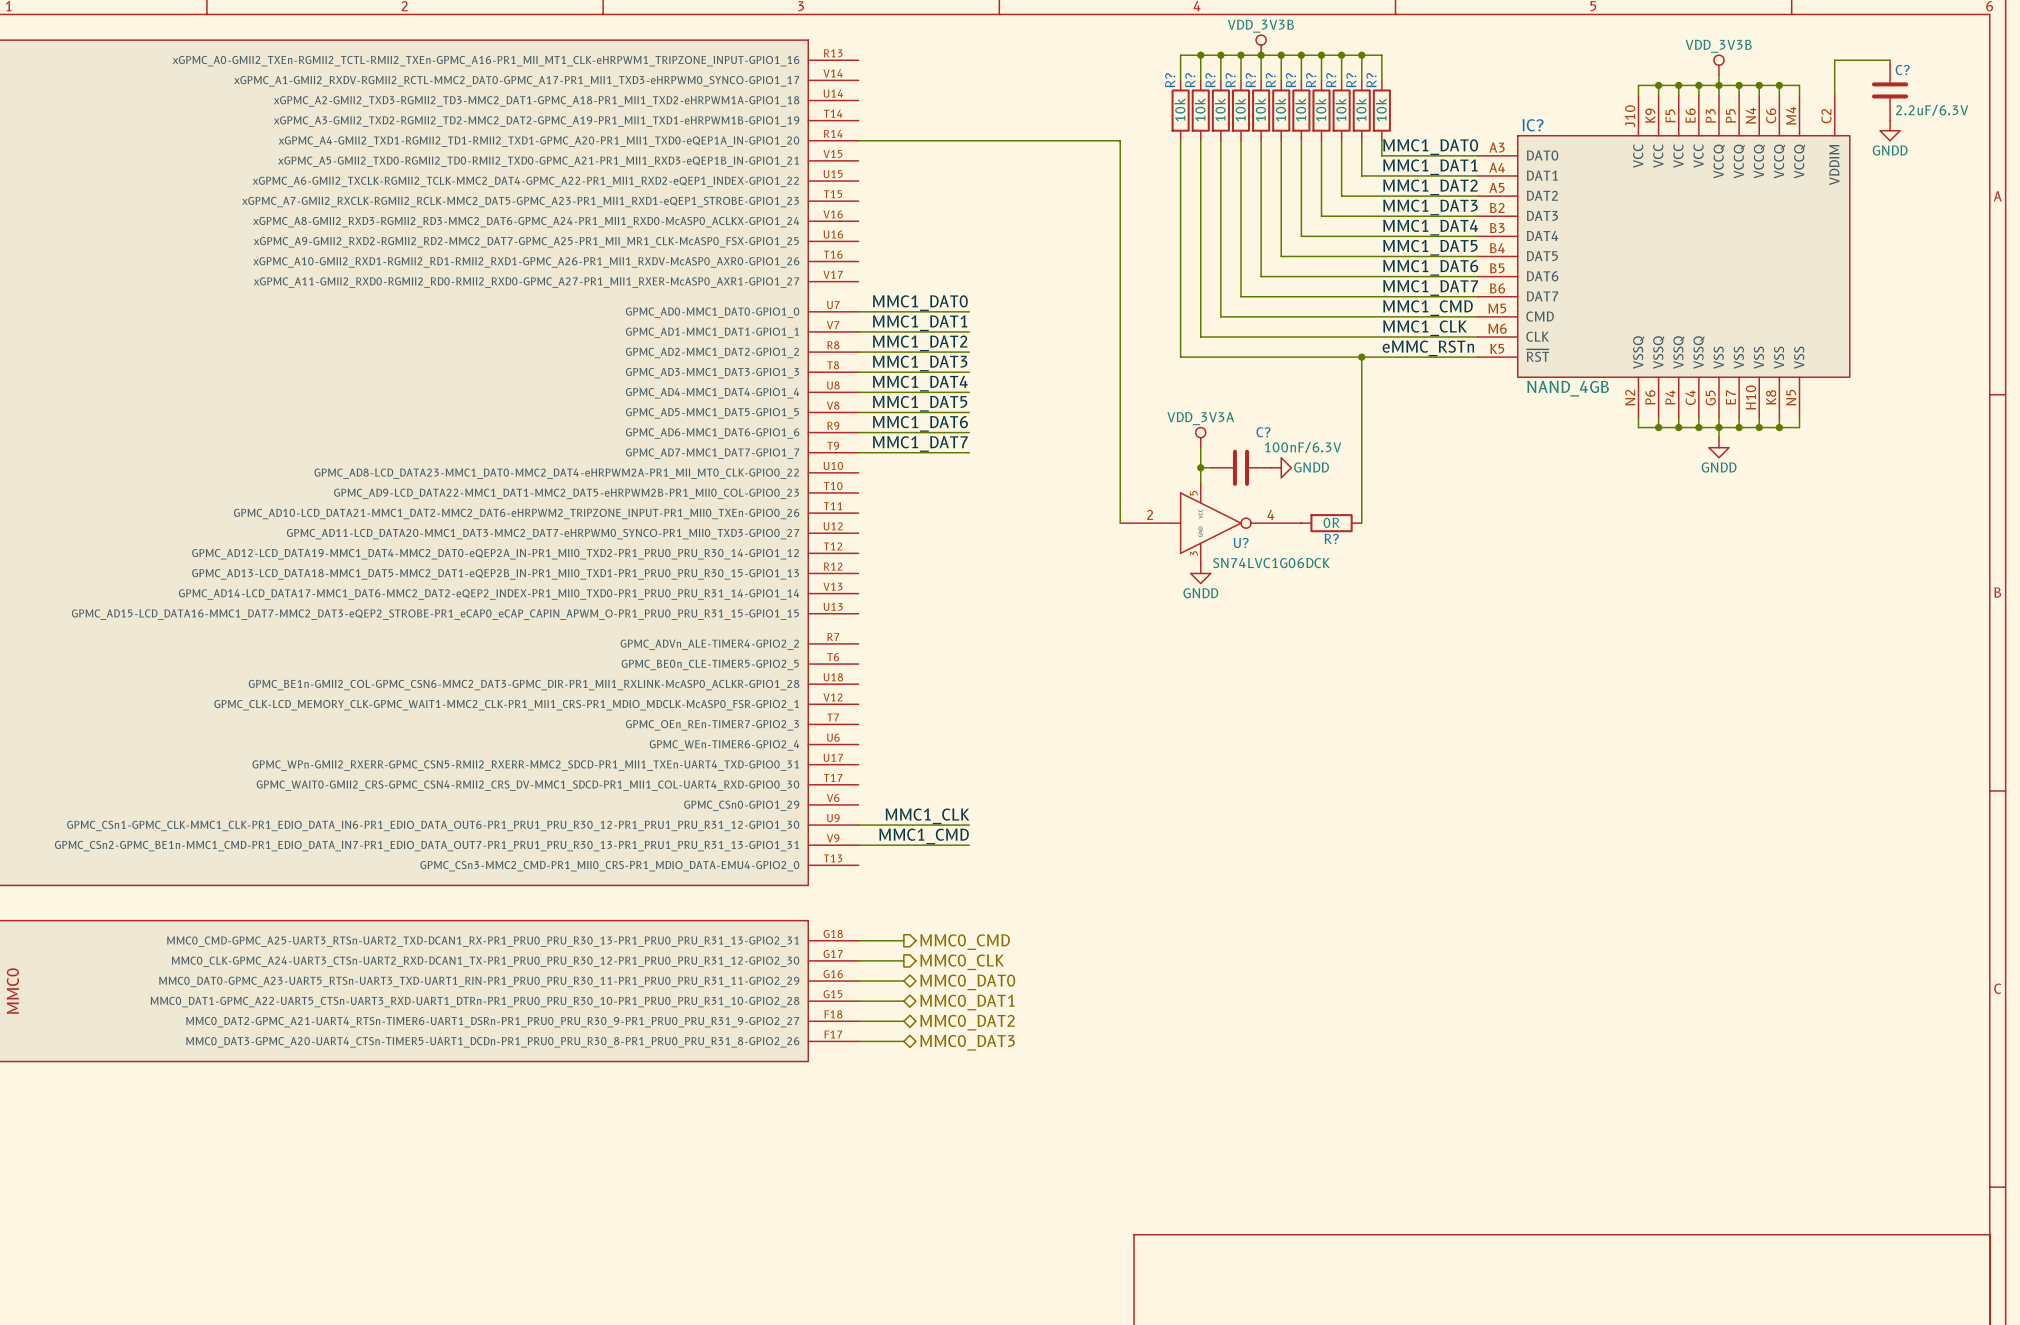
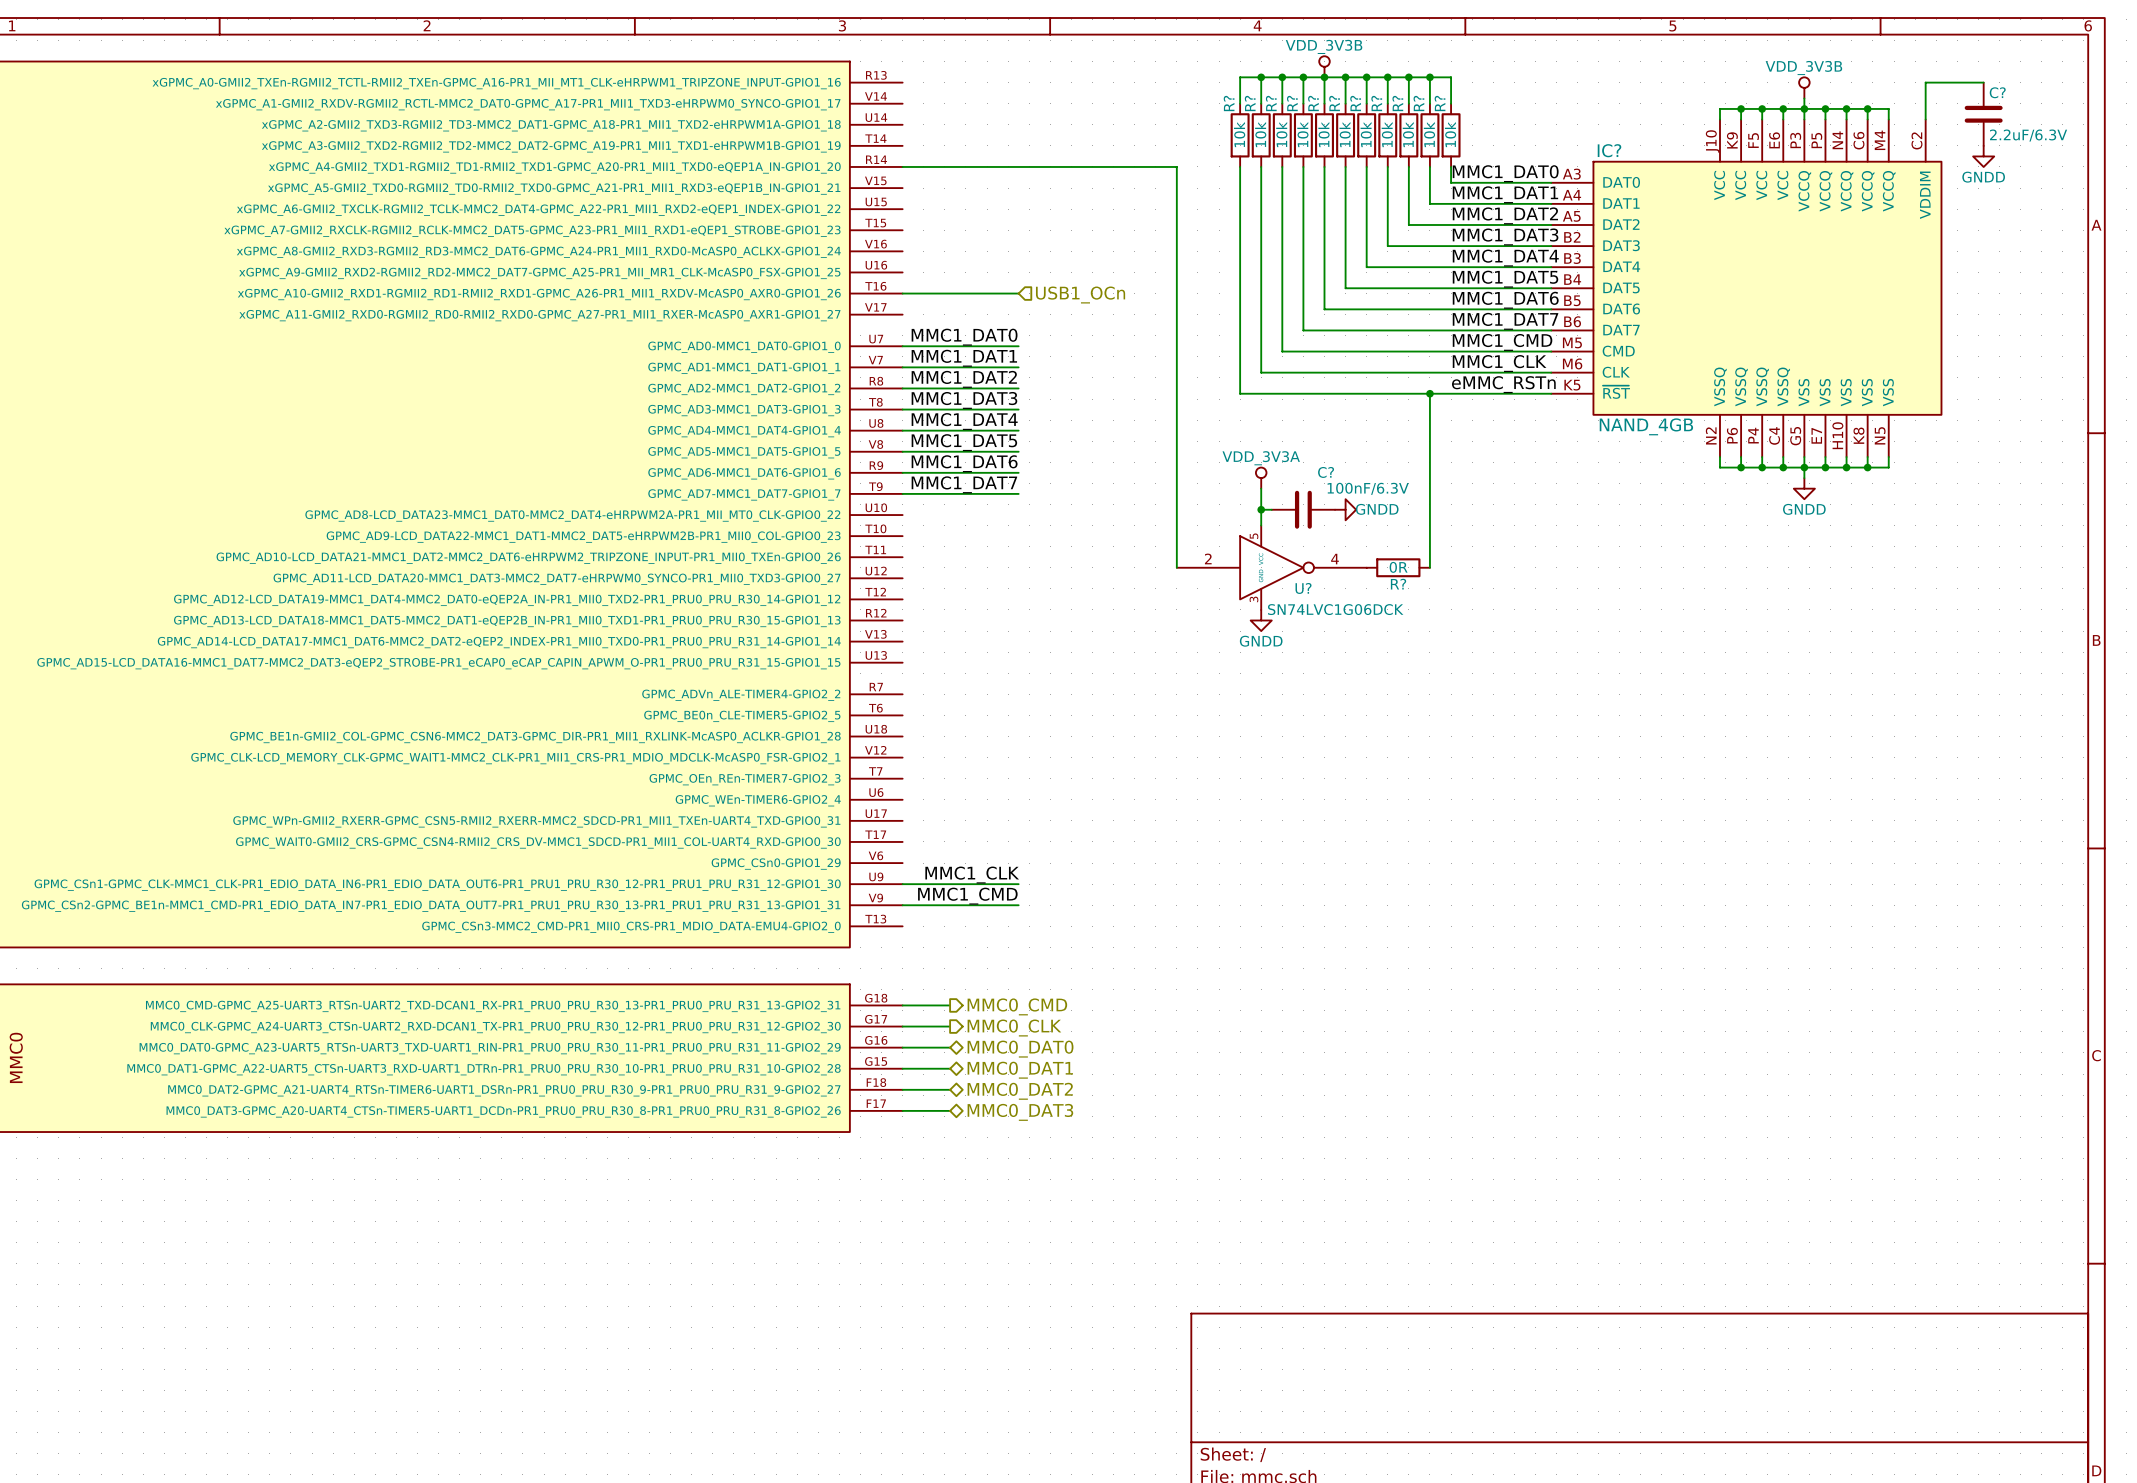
wire: none -> (902, 293) (1018, 293)
hierarchical label: none -> USB1_OCn (1080, 295)

